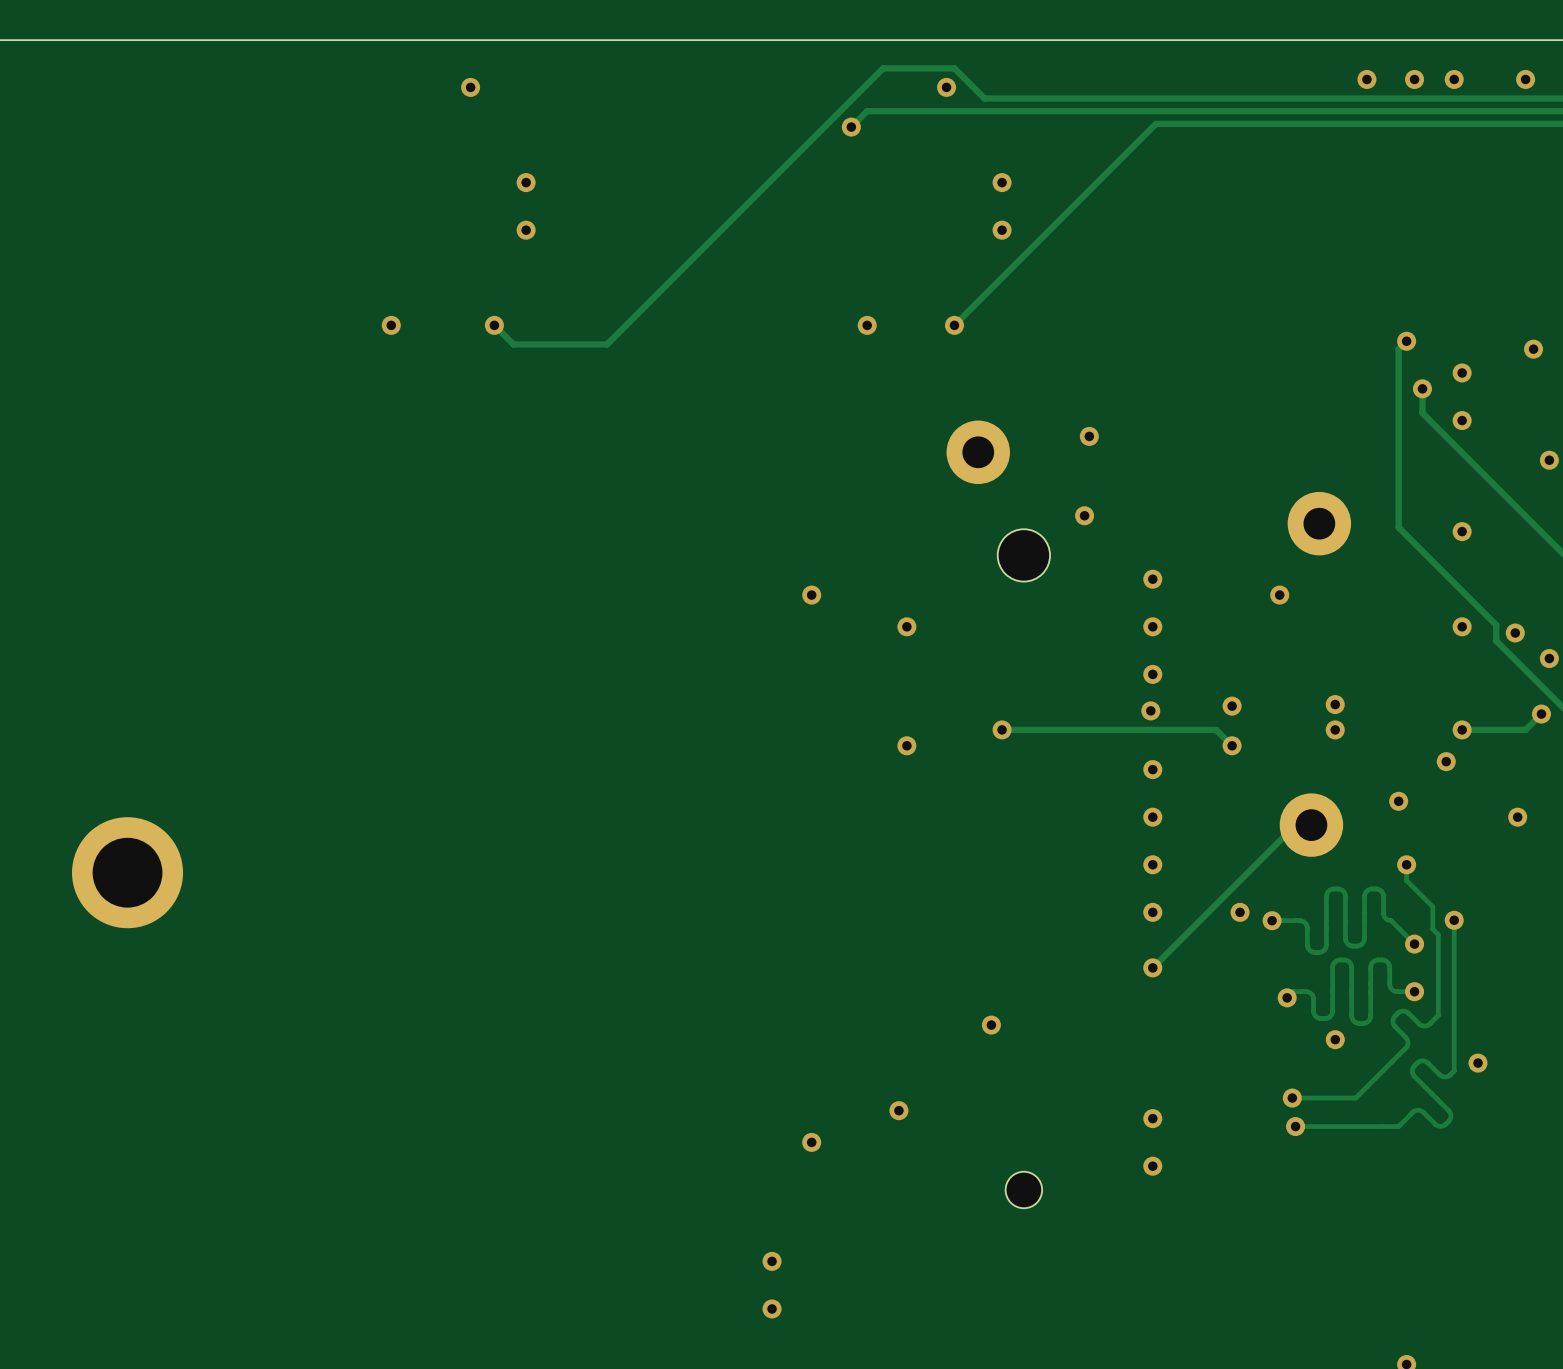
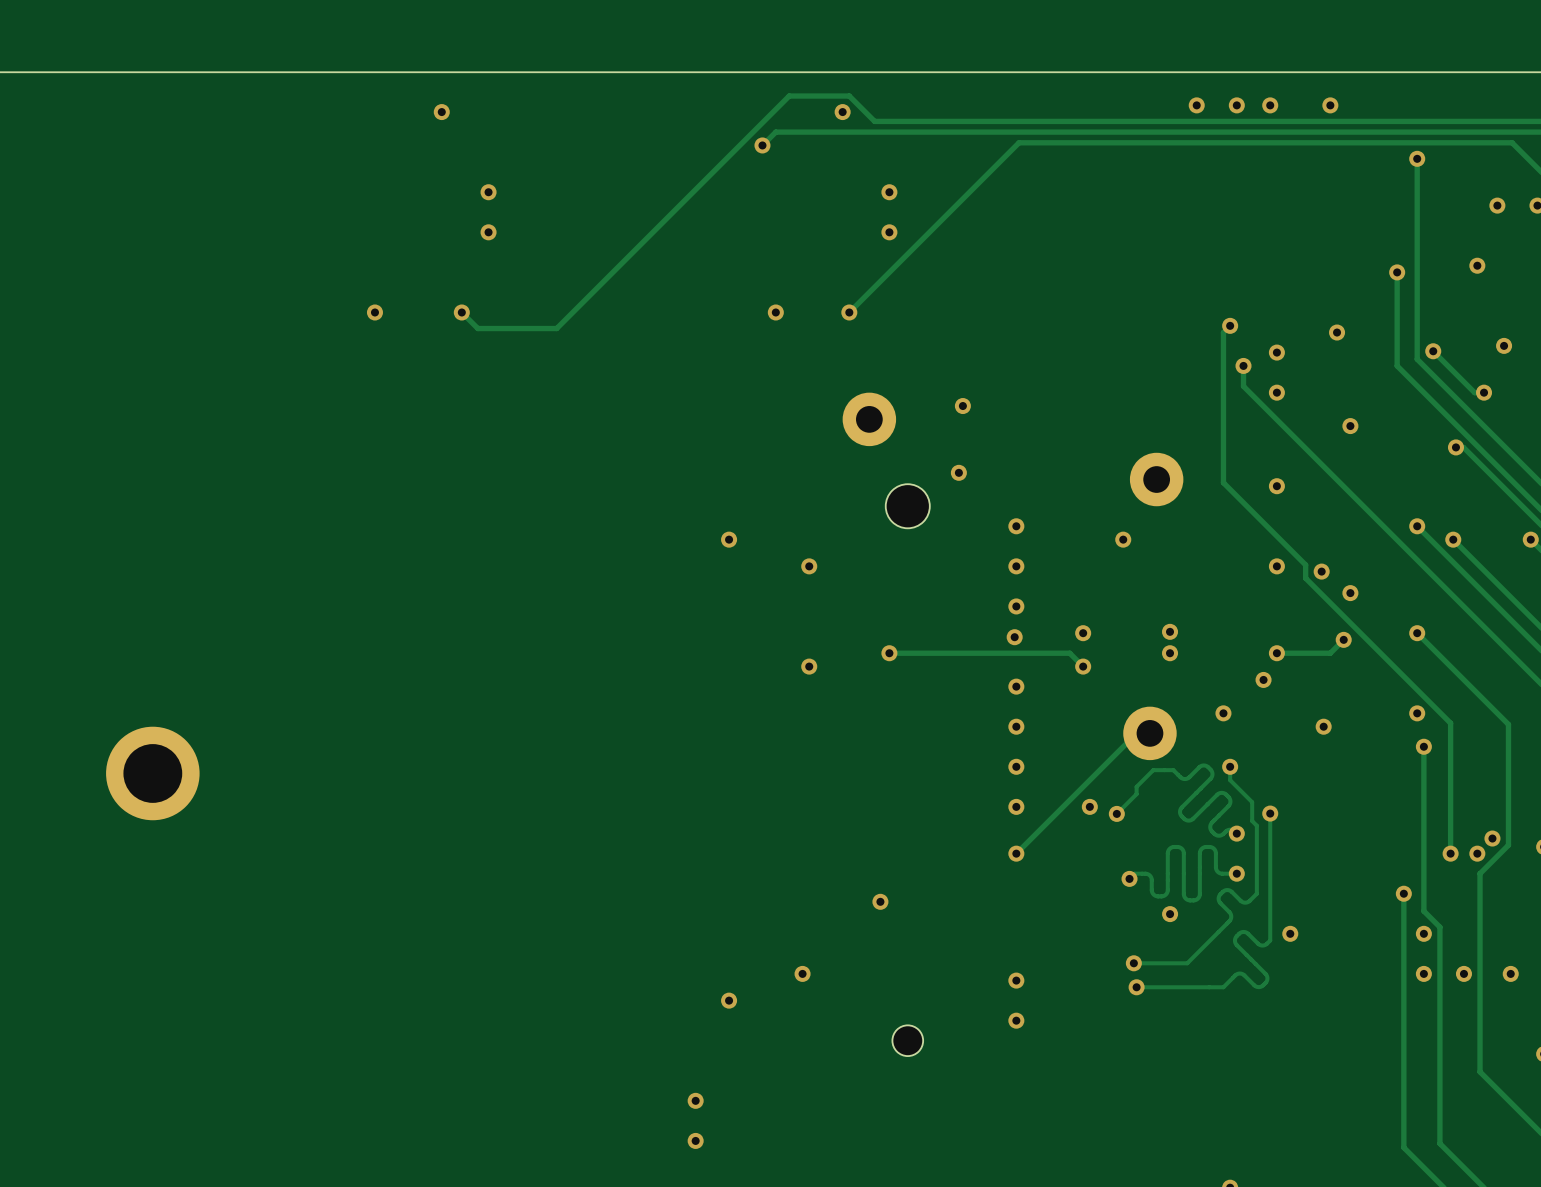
track: (1272, 920) (1303, 921) (1307, 926) (1308, 948) (1313, 952) (1322, 951) (1326, 945) (1326, 894) (1330, 889) (1339, 889) (1345, 895) (1345, 940) (1350, 945) (1359, 945) (1364, 939) (1364, 894) (1368, 889) (1376, 889) (1383, 894) (1384, 917) (1391, 920) (1414, 944) -> (1116, 813) (1136, 794) (1136, 786) (1153, 770) (1173, 770) (1180, 777) (1185, 779) (1199, 766) (1204, 765) (1211, 770) (1211, 776) (1181, 807) (1180, 814) (1186, 820) (1191, 819) (1217, 794) (1223, 793) (1229, 798) (1229, 803) (1211, 823) (1210, 829) (1218, 835) (1229, 829) (1236, 833)

